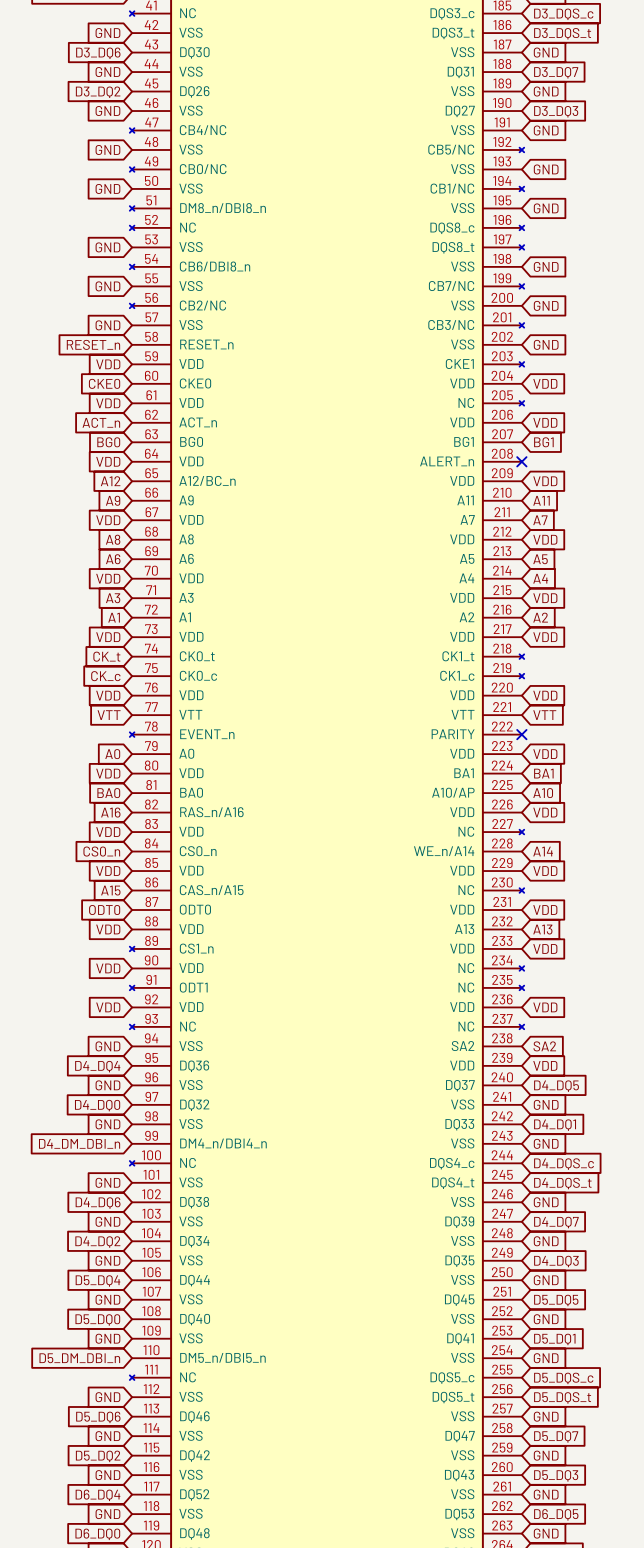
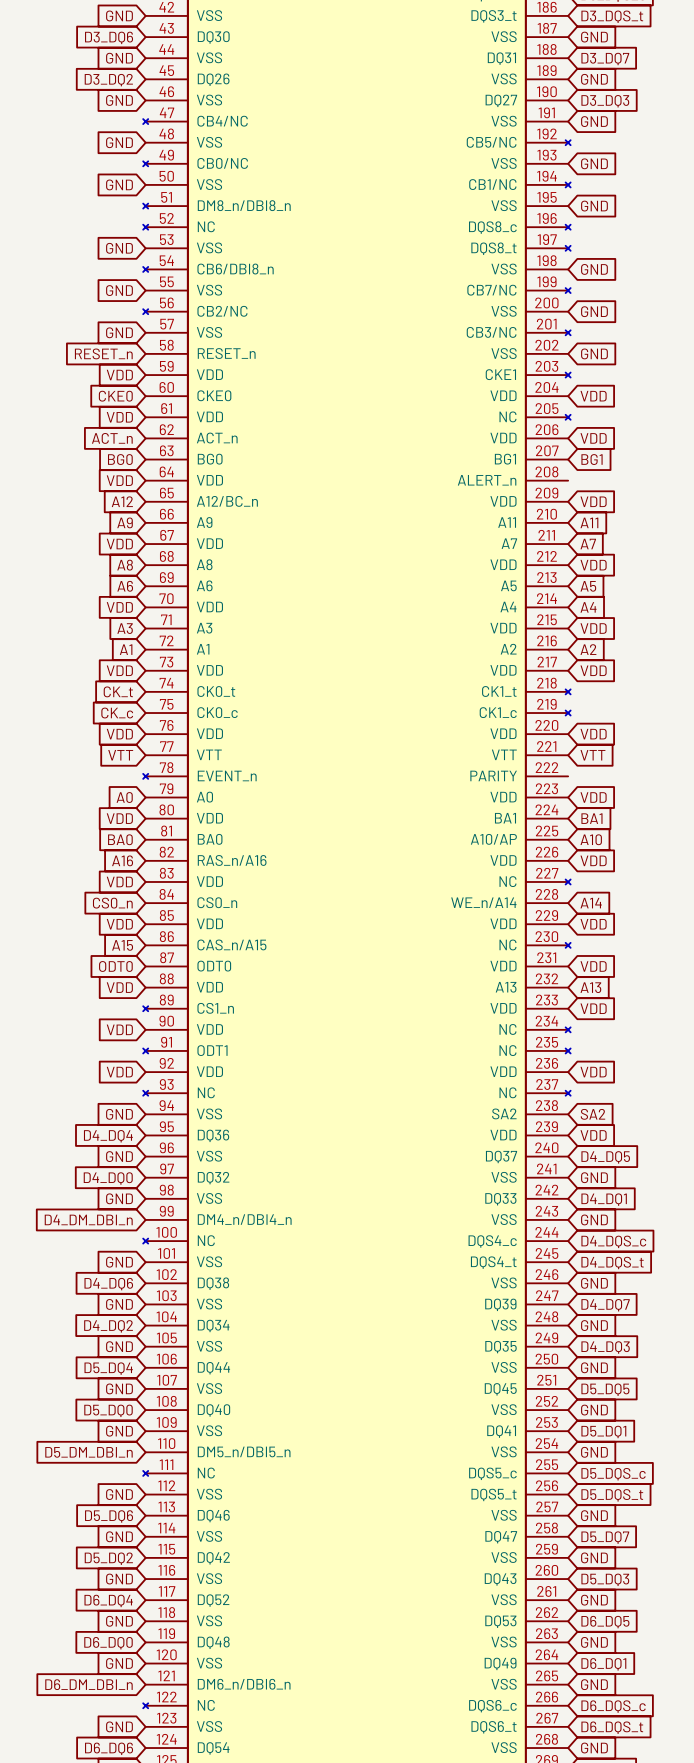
no-connect mark: (521, 461) -> none
no-connect mark: (521, 734) -> none

